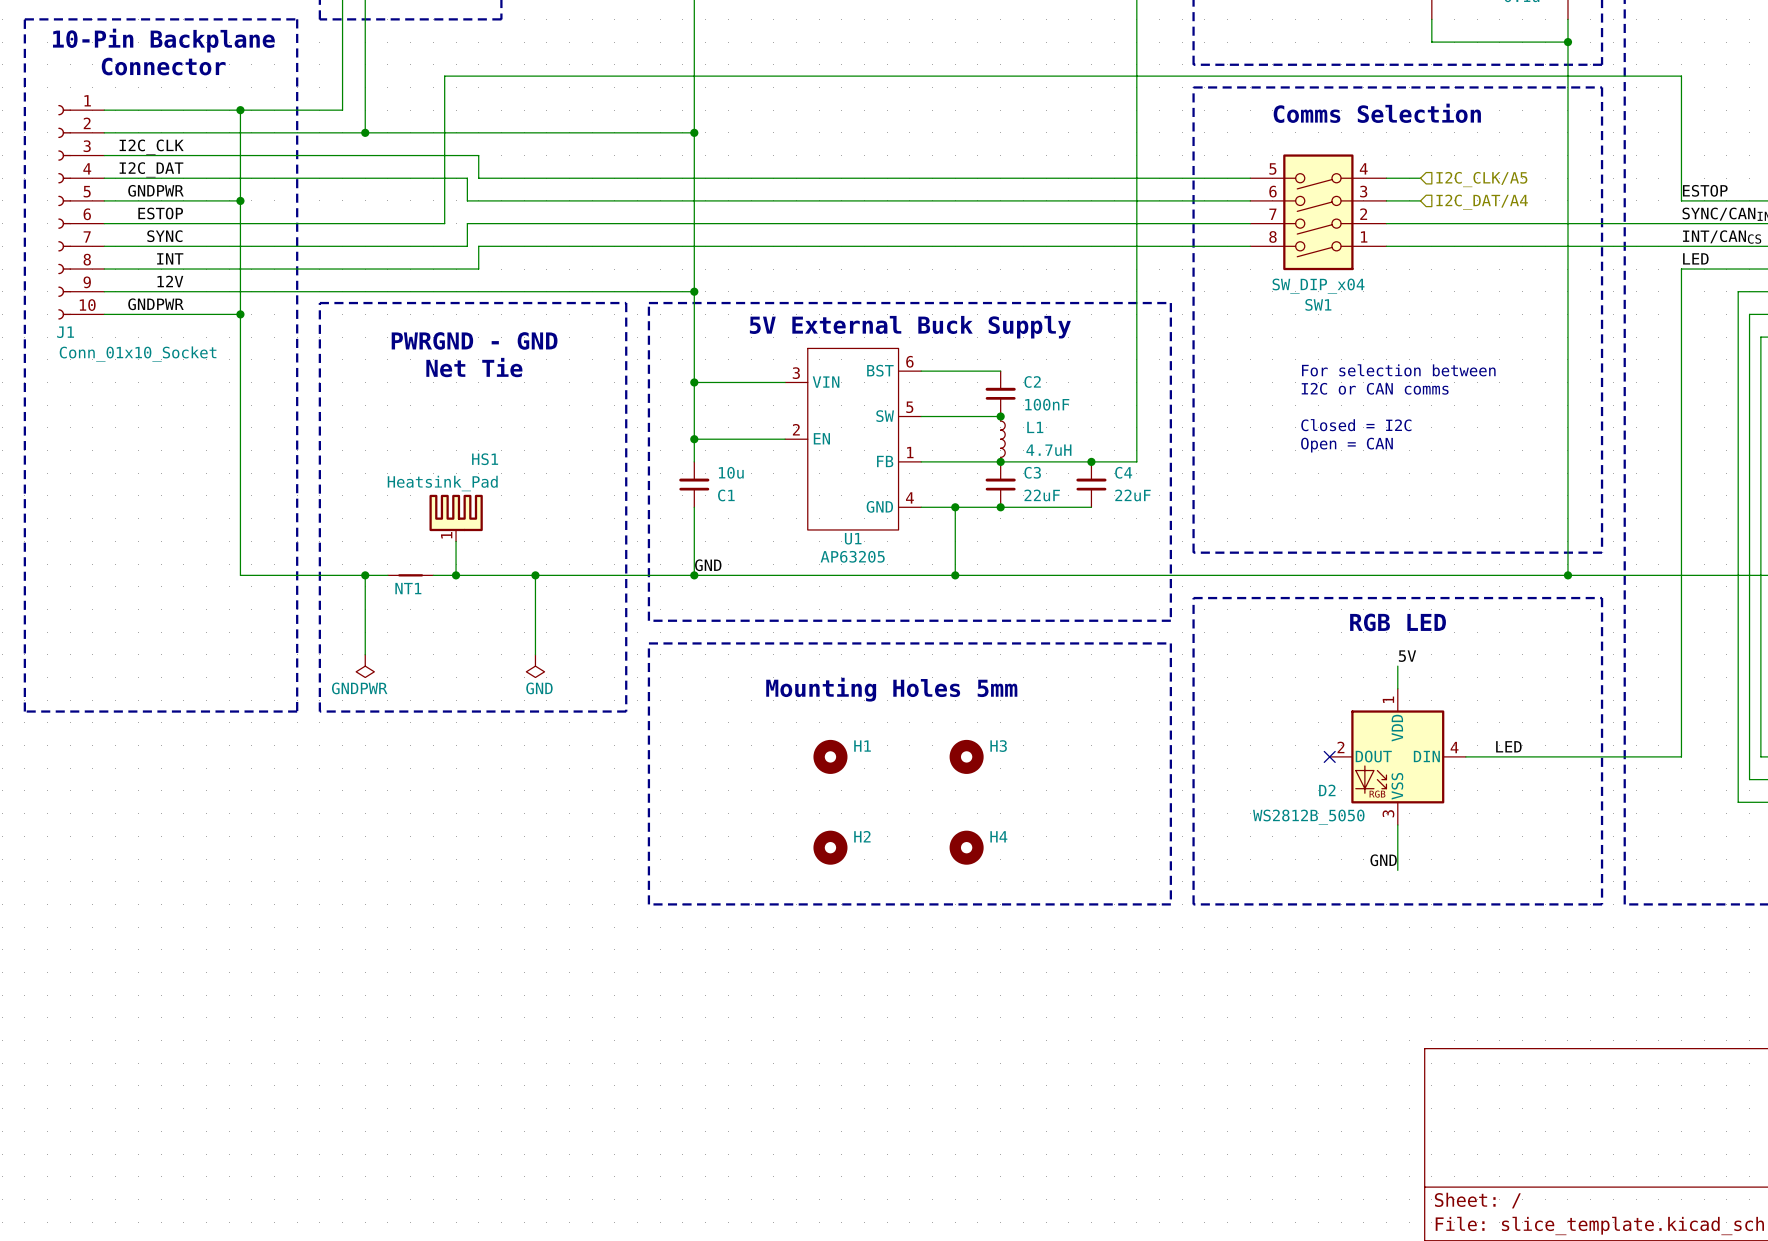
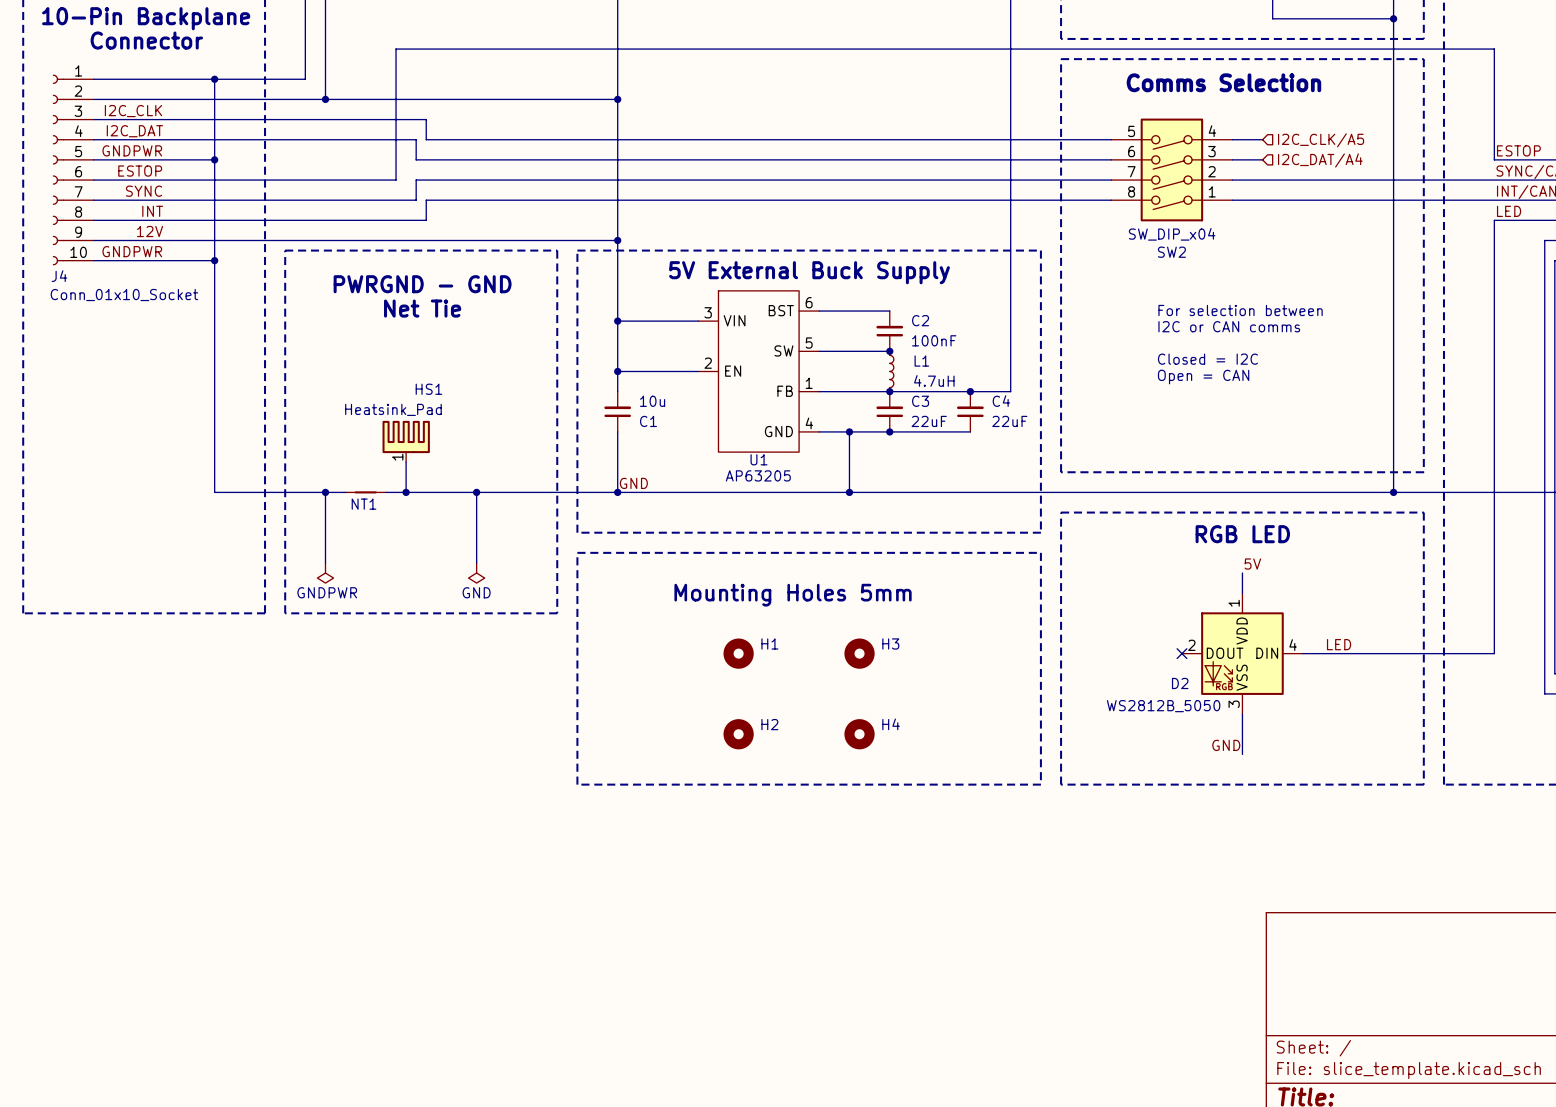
SW1 name: SW1 (1318, 304) -> SW2 (1171, 252)
J1 name: J1 (65, 332) -> J4 (59, 276)

